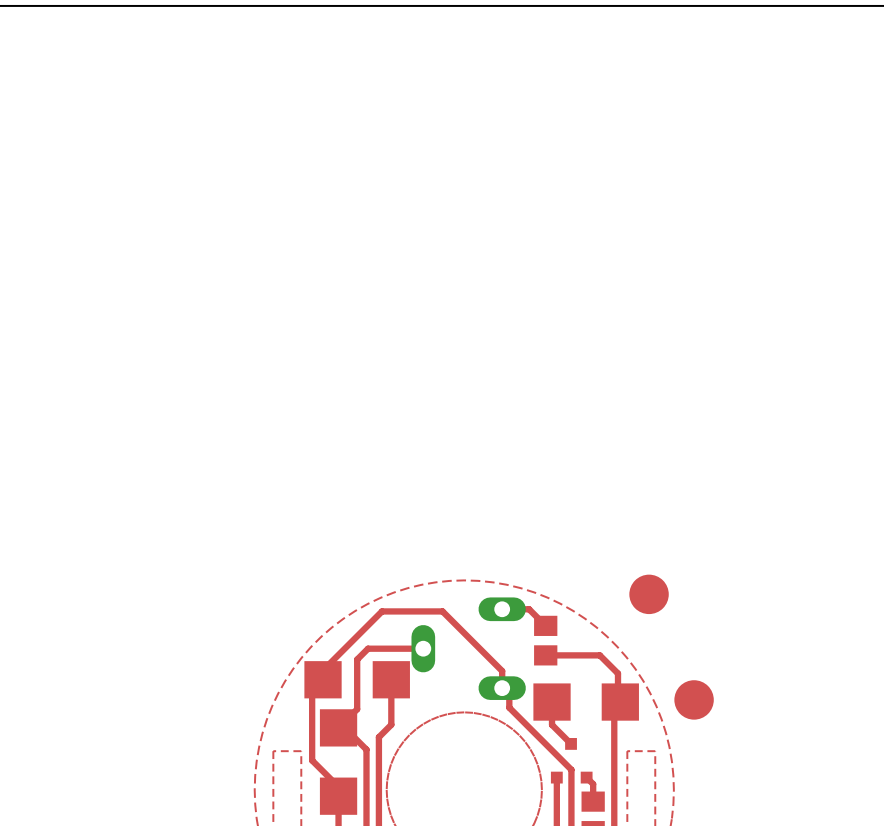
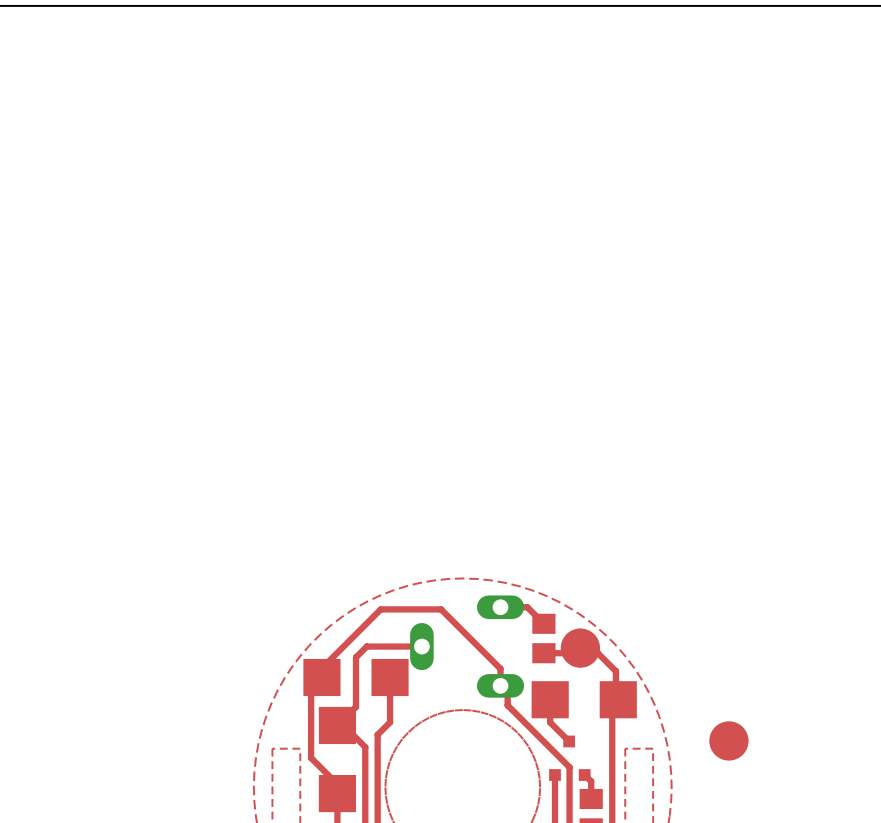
part: (649, 594) -> none
part: none -> (580, 648)
part position: (694, 699) -> (728, 740)

